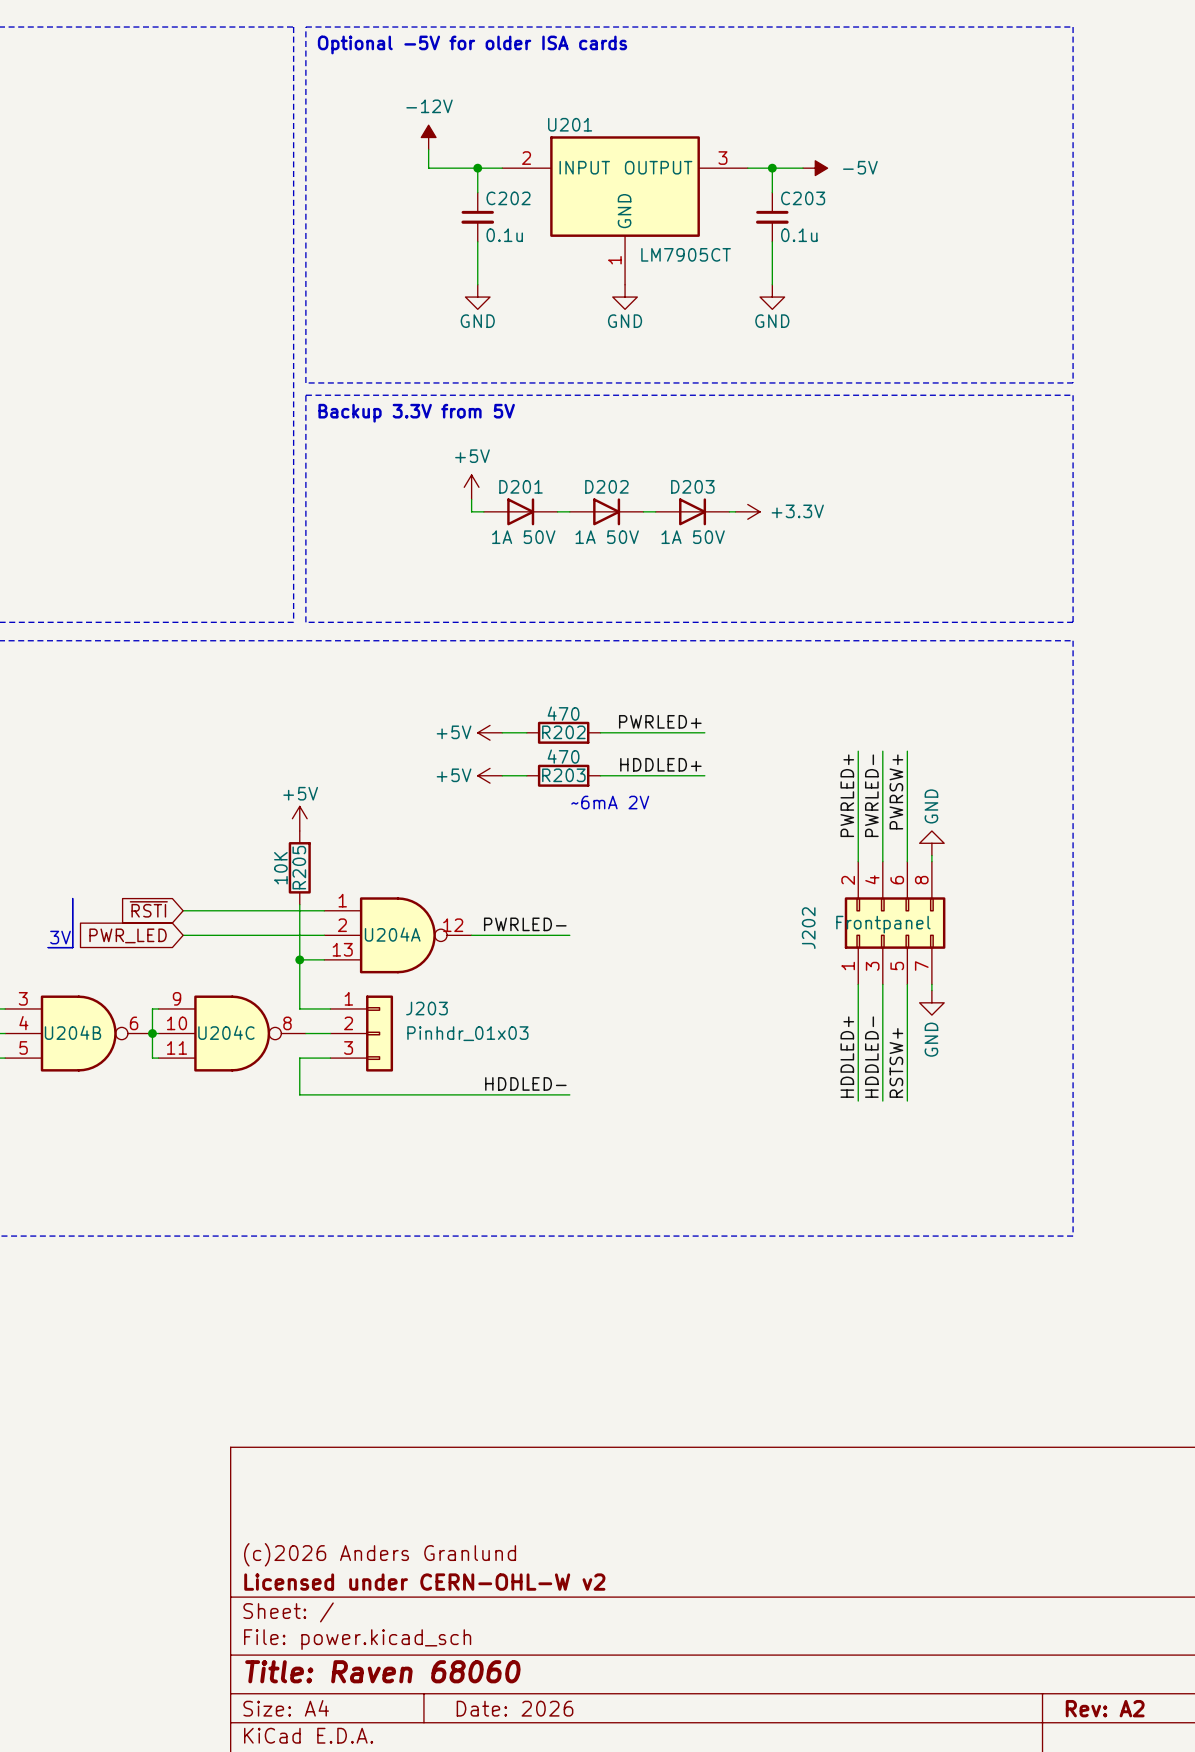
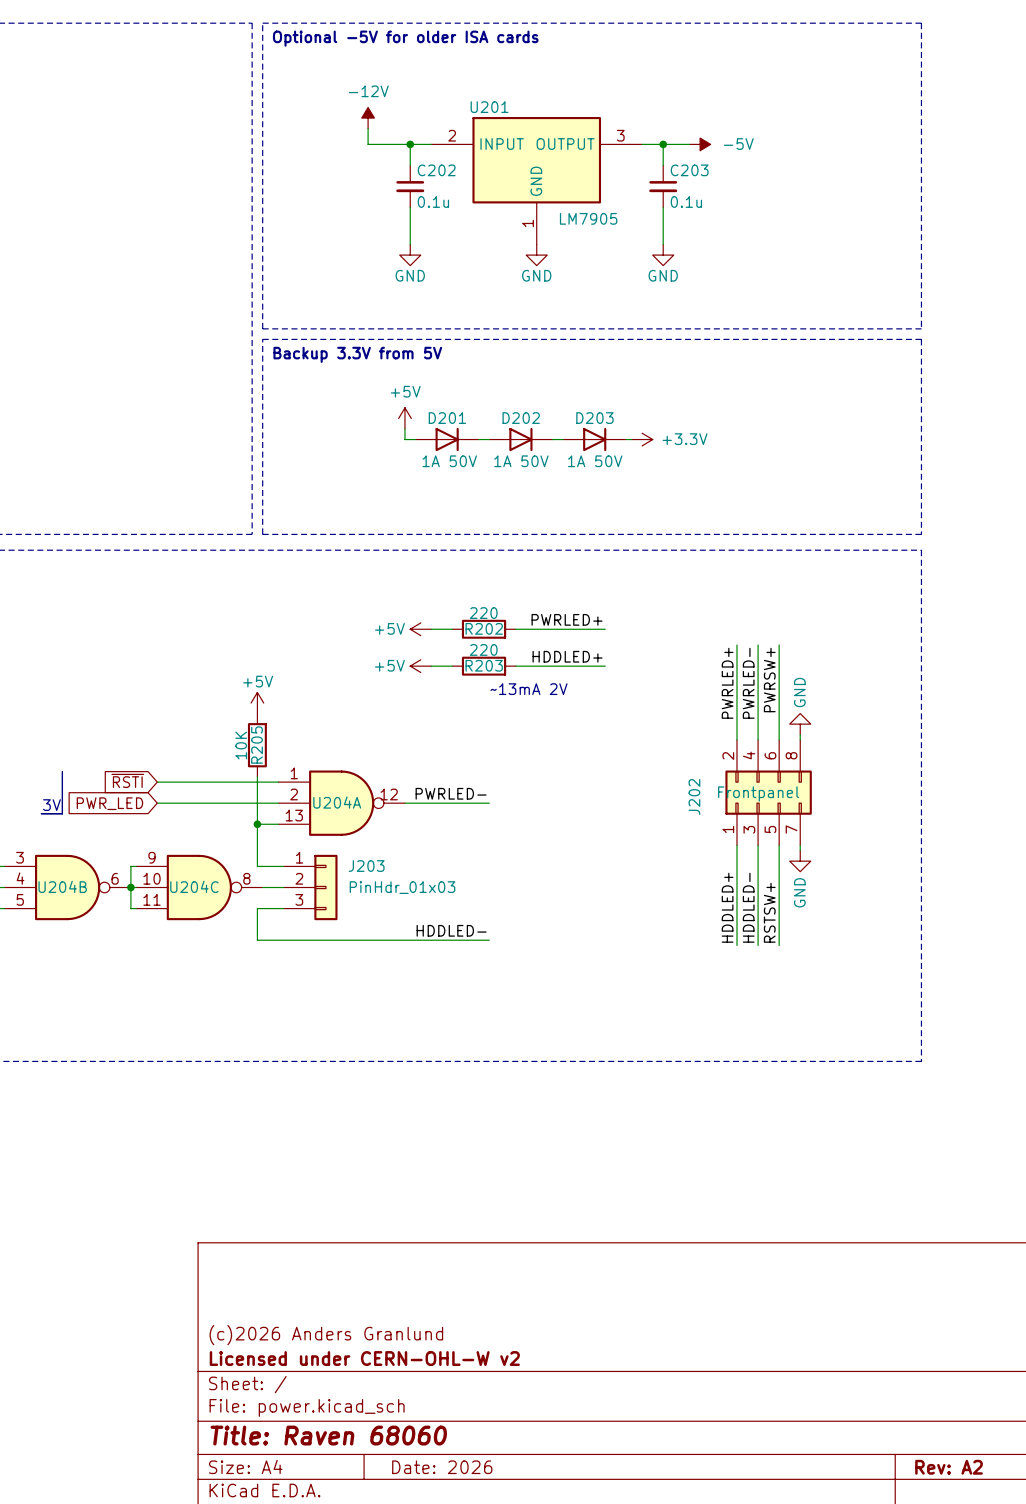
U201 value: LM7905CT (686, 254) -> LM7905 (588, 218)
R202 value: 470 (563, 713) -> 220 (483, 613)
R203 value: 470 (563, 756) -> 220 (483, 649)
text: ~6mA 2V (610, 802) -> ~13mA 2V (529, 689)
J203 value: Pinhdr_01x03 (467, 1033) -> PinHdr_01x03 (402, 887)

